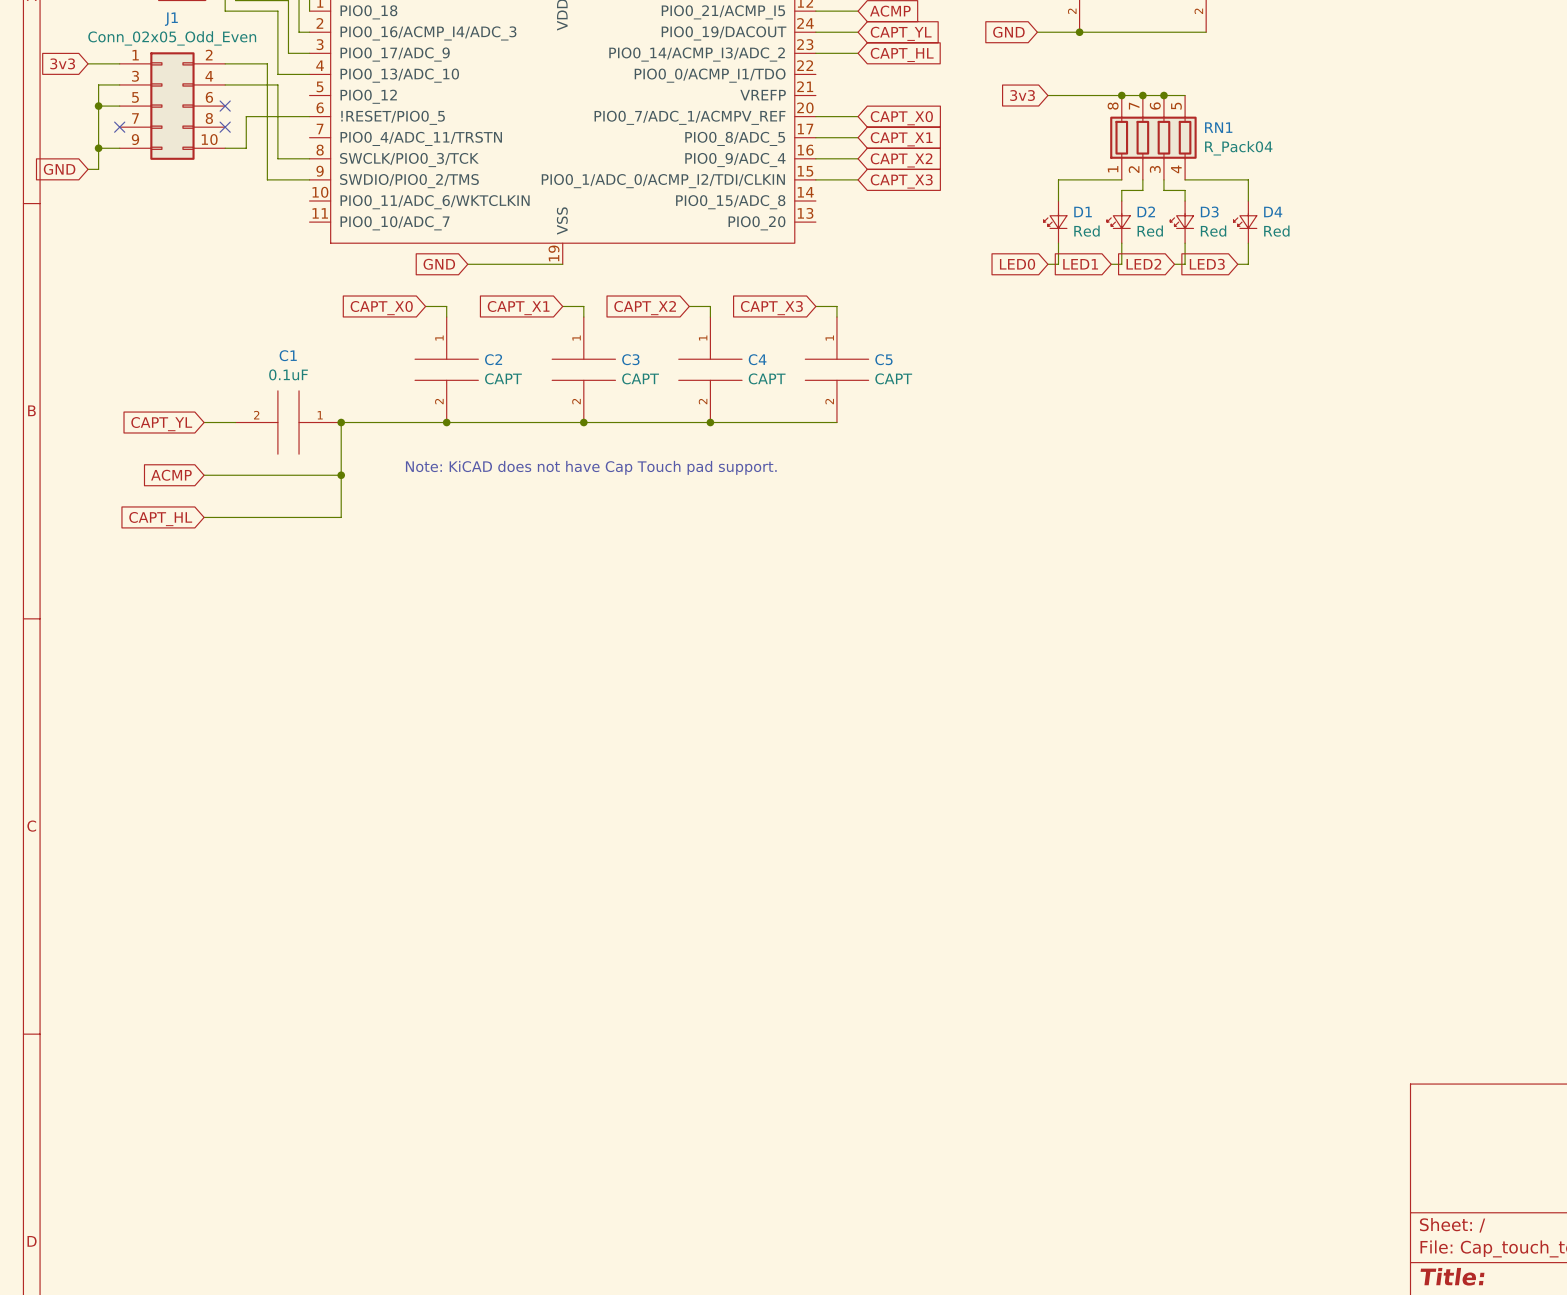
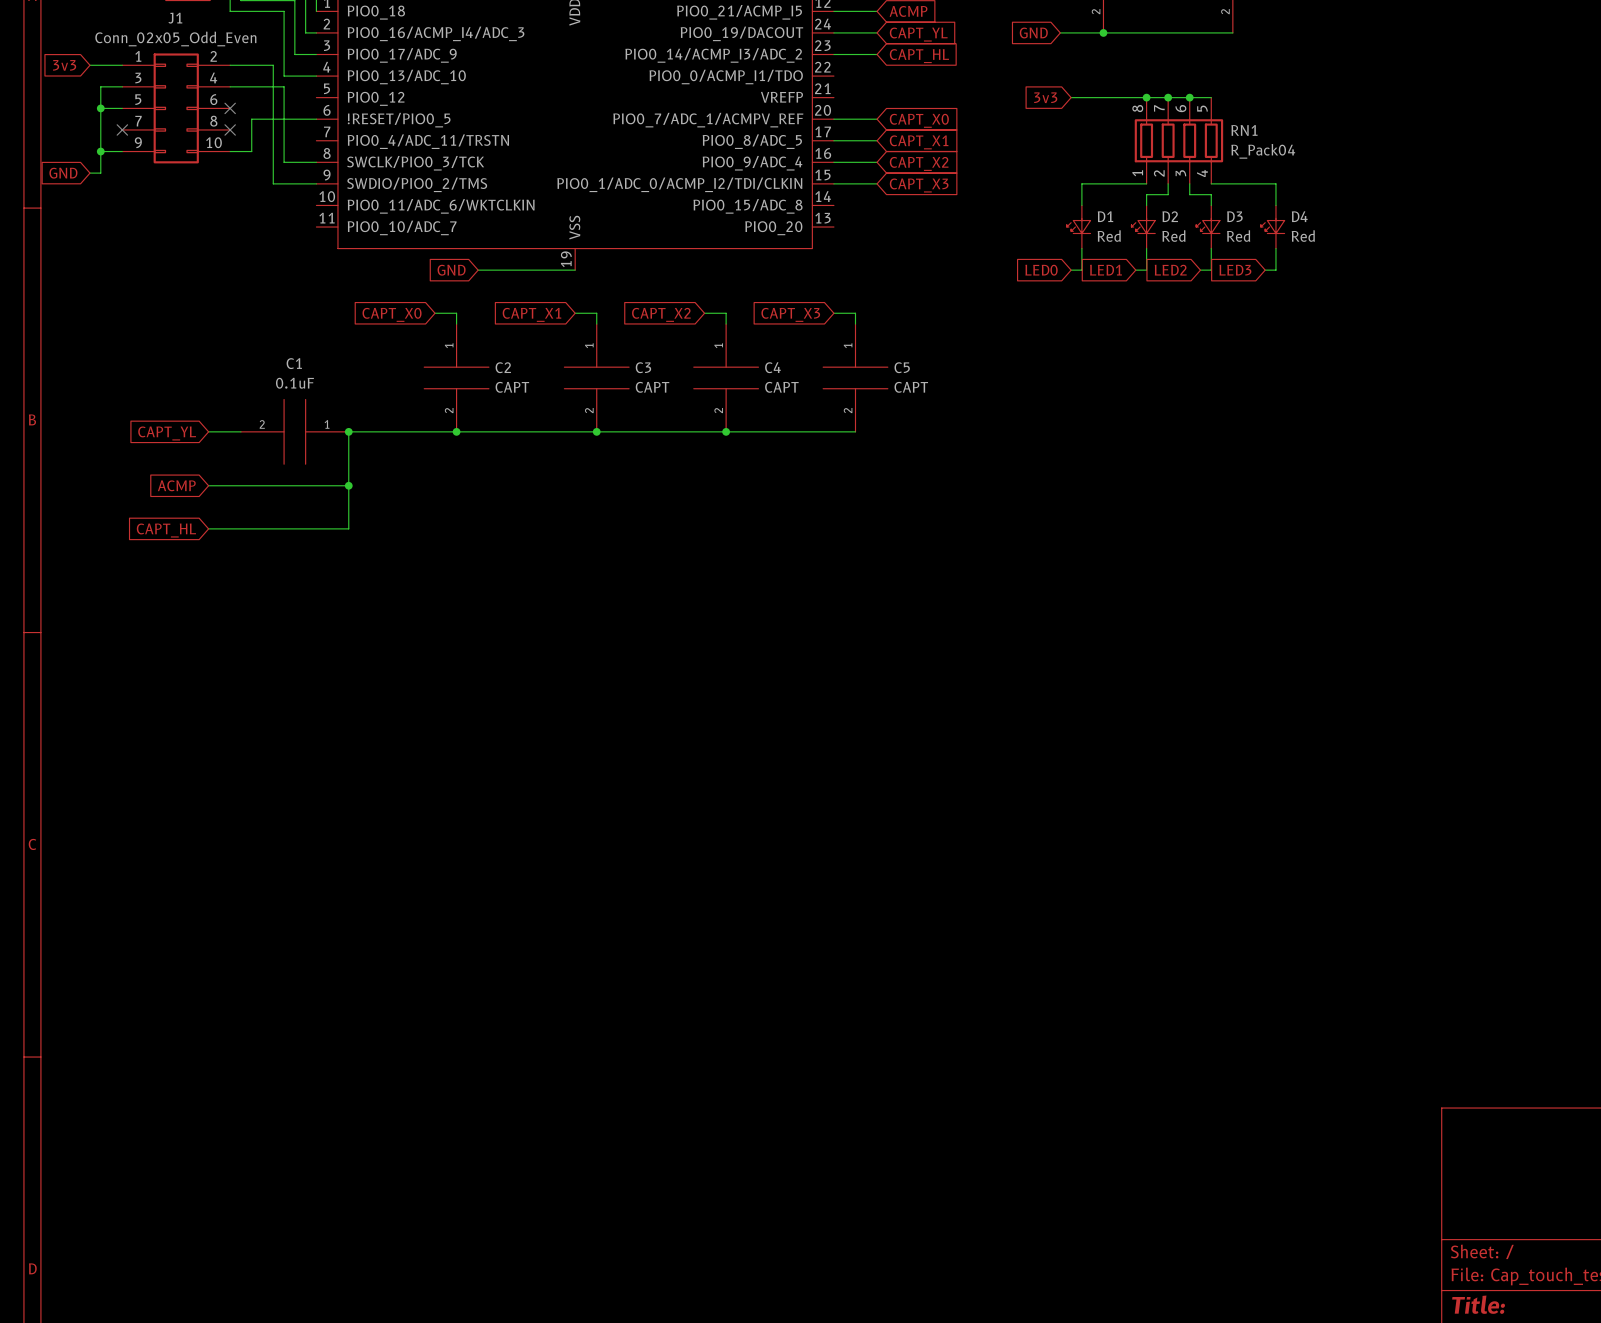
text: Note: KiCAD does not have Cap Touch pad support. (591, 467) -> none

